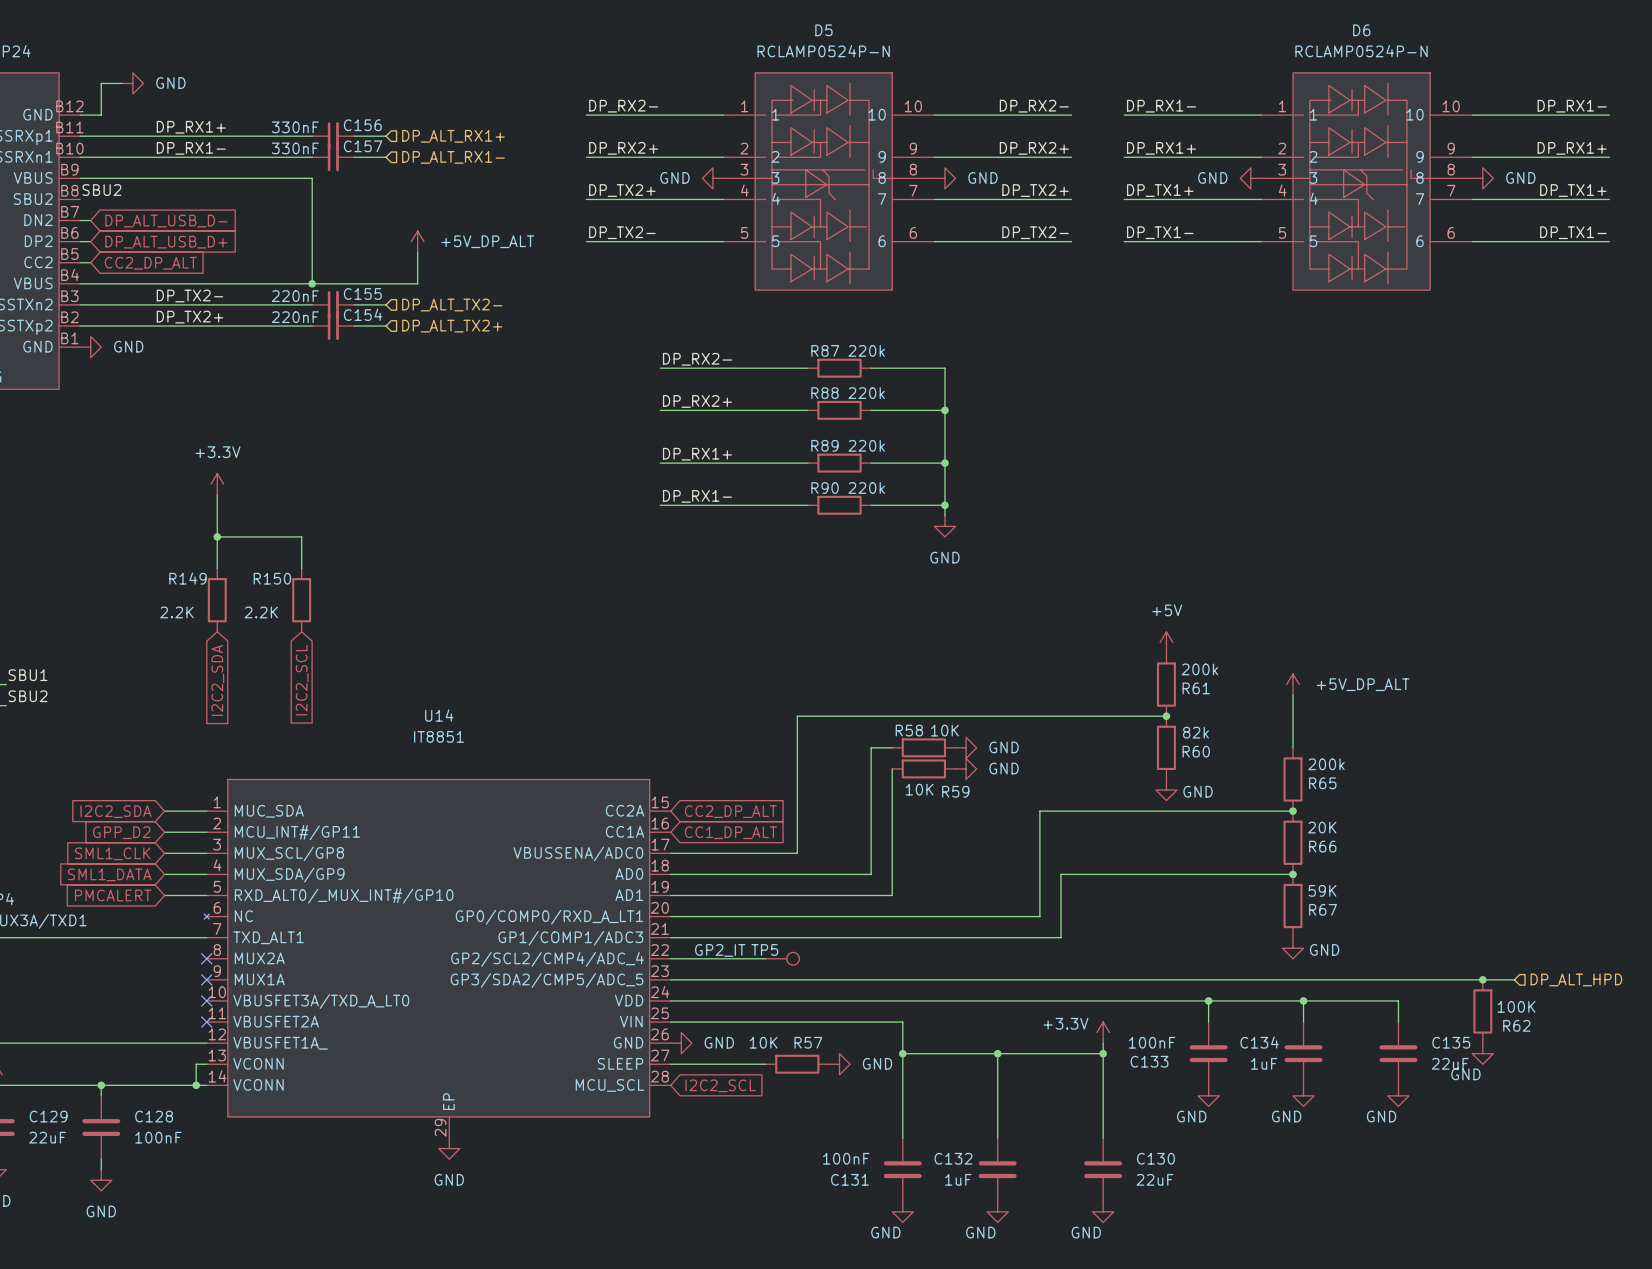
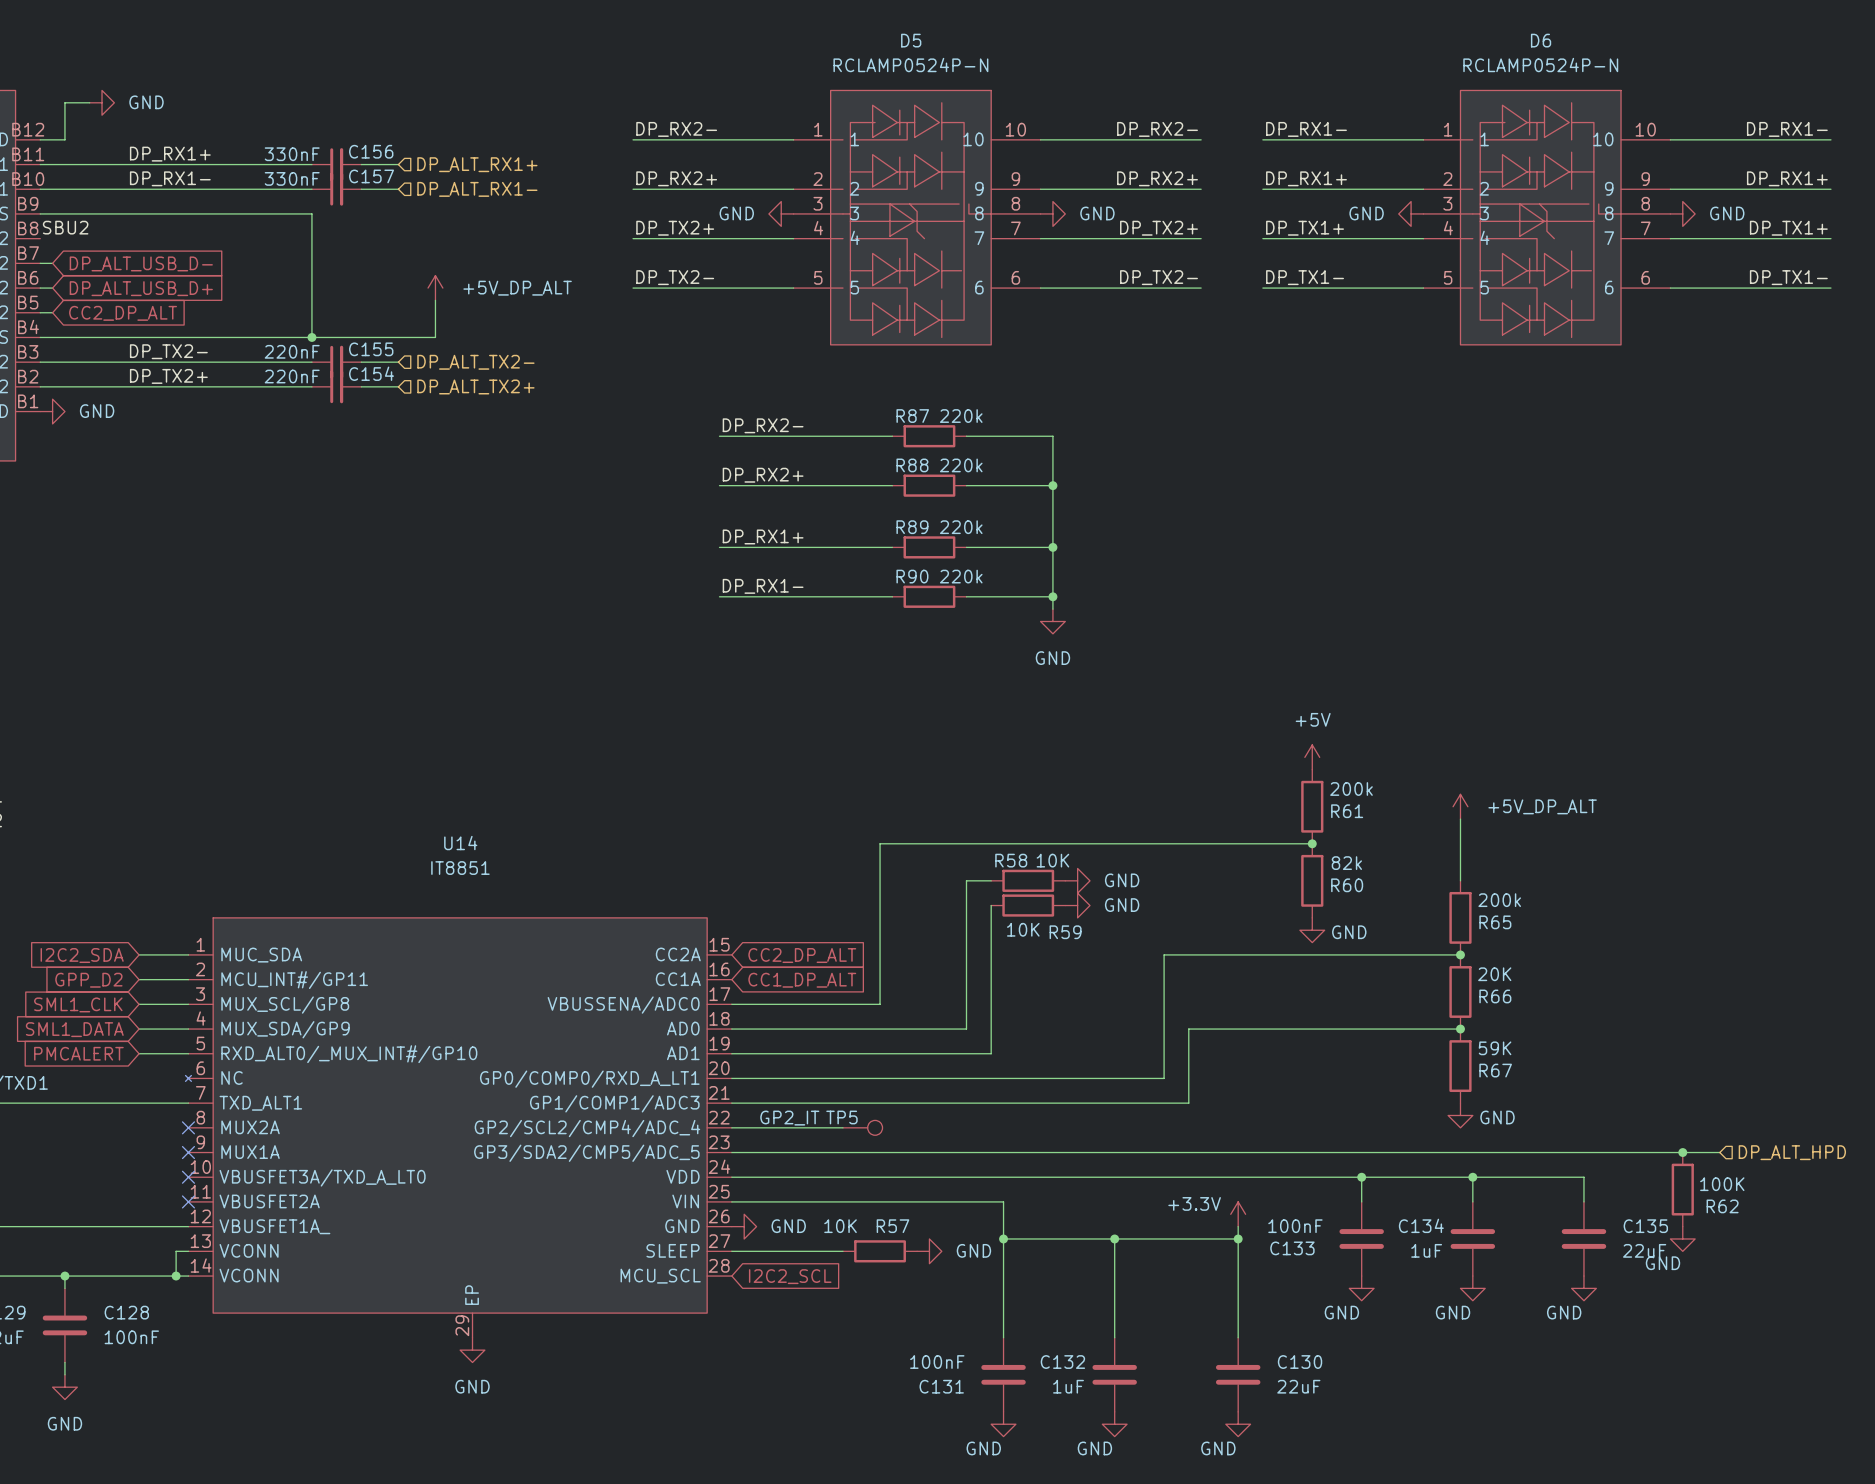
power symbol: +3.3V (217, 484) -> none
wire: (217, 494) (217, 568) -> none
wire: (217, 536) (301, 536) (301, 568) -> none
junction: (217, 536) -> none
R149: 2.2K (217, 600) -> none
R150: 2.2K (301, 600) -> none
global label: I2C2_SDA (217, 680) -> none
global label: I2C2_SCL (302, 680) -> none

